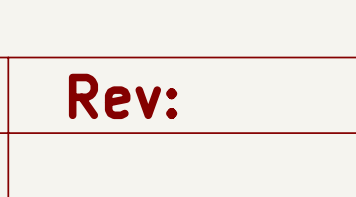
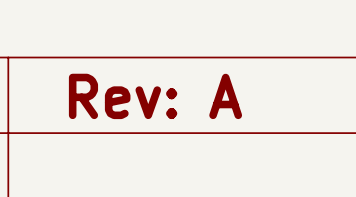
title block: Rev: (123, 96) -> Rev: A (155, 96)

